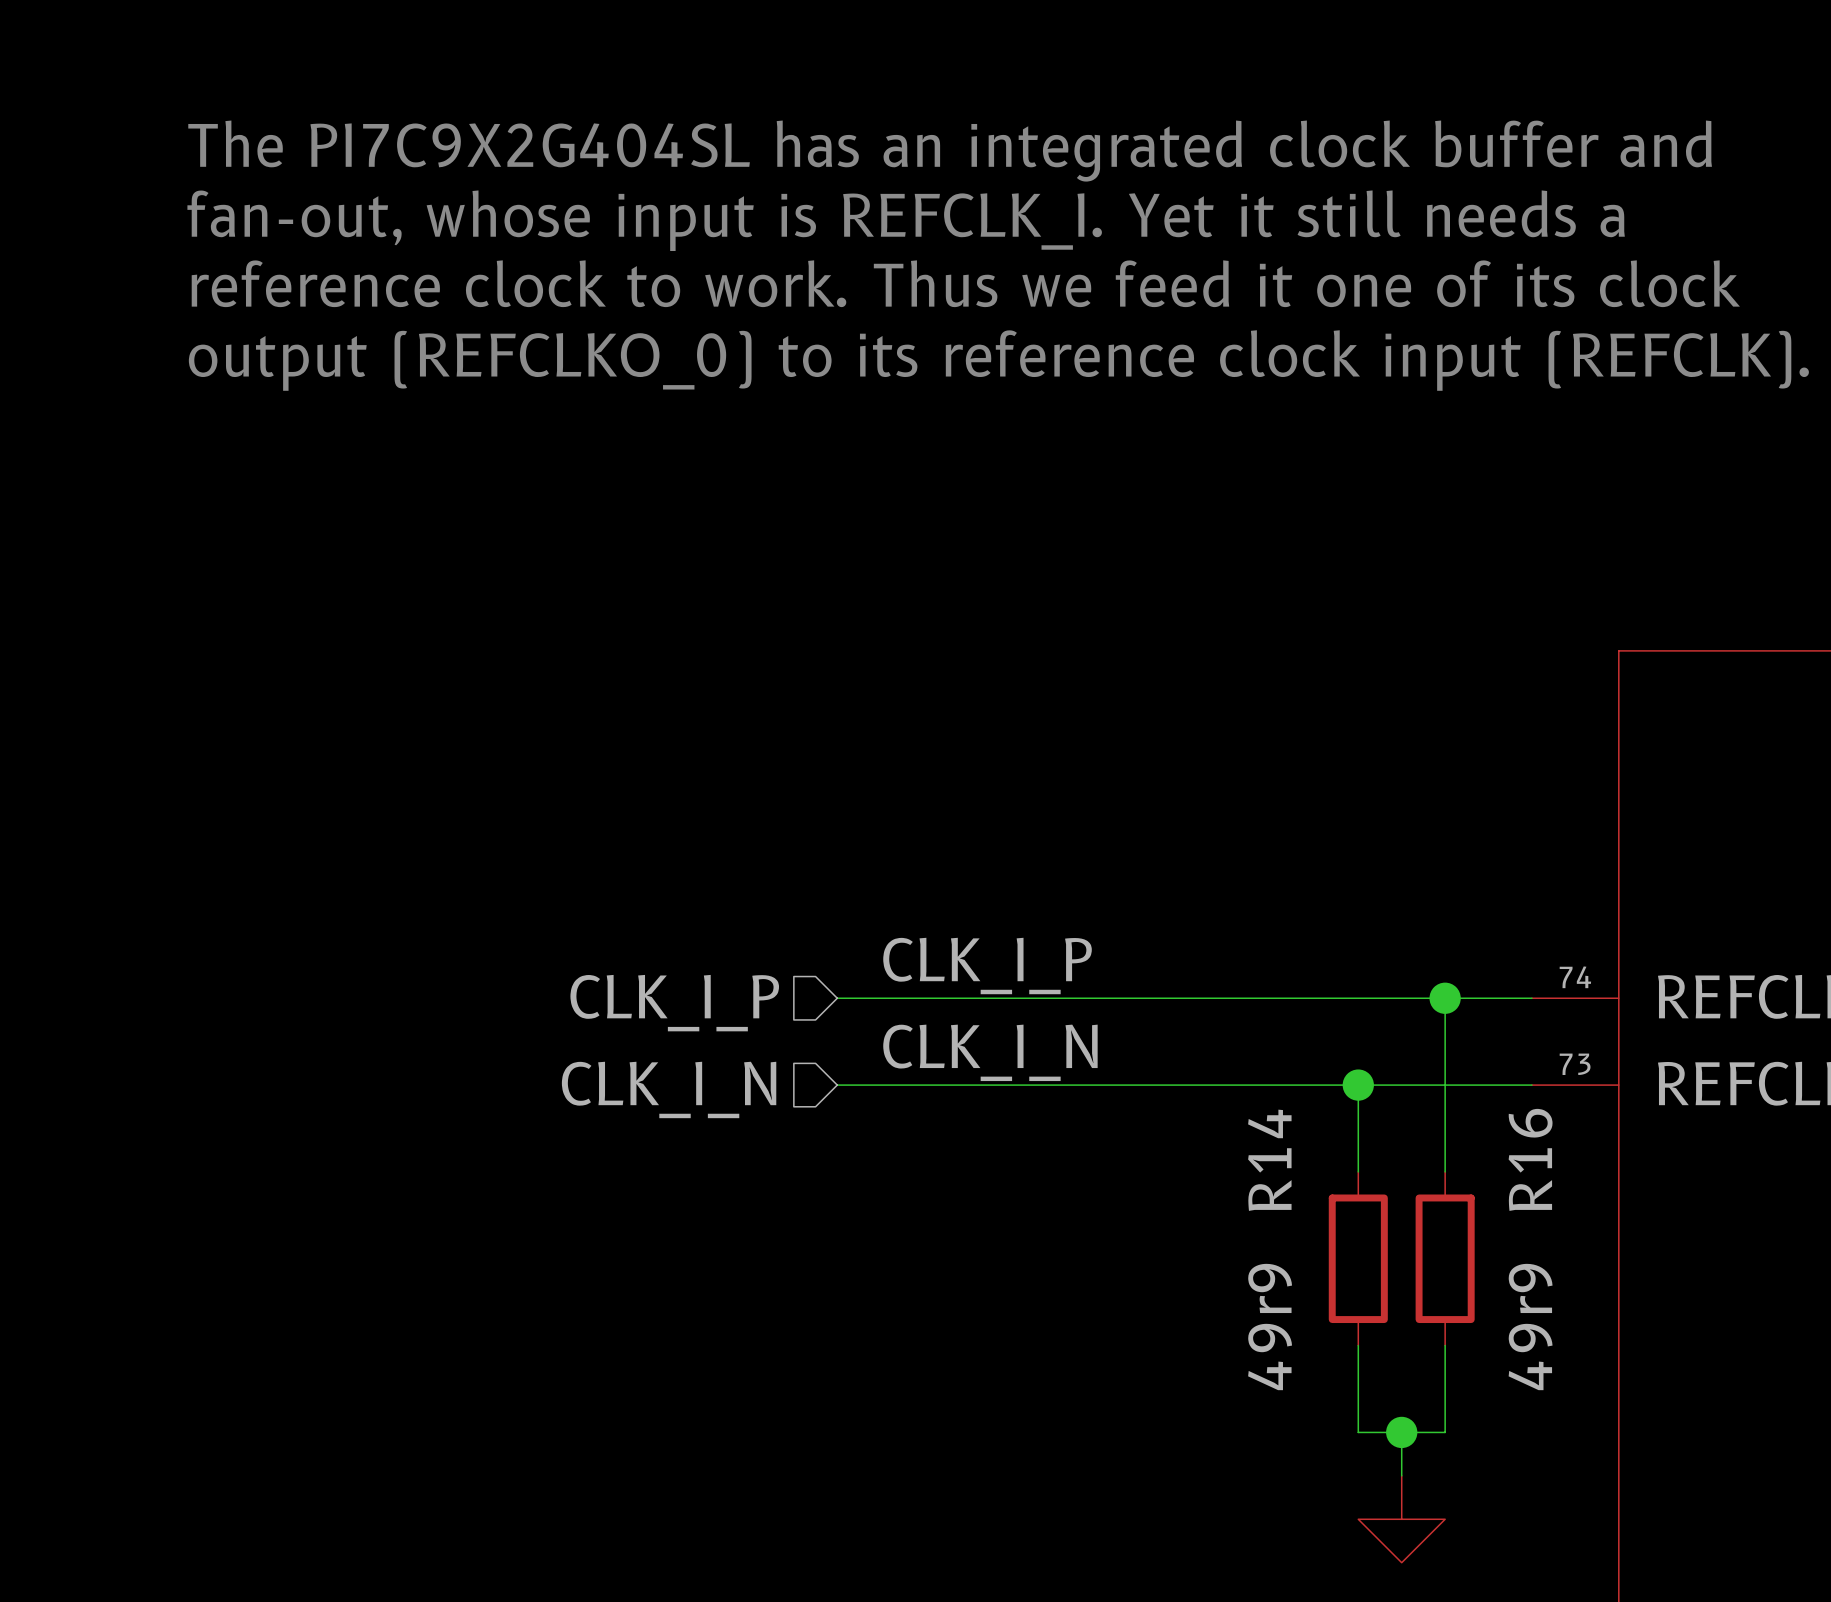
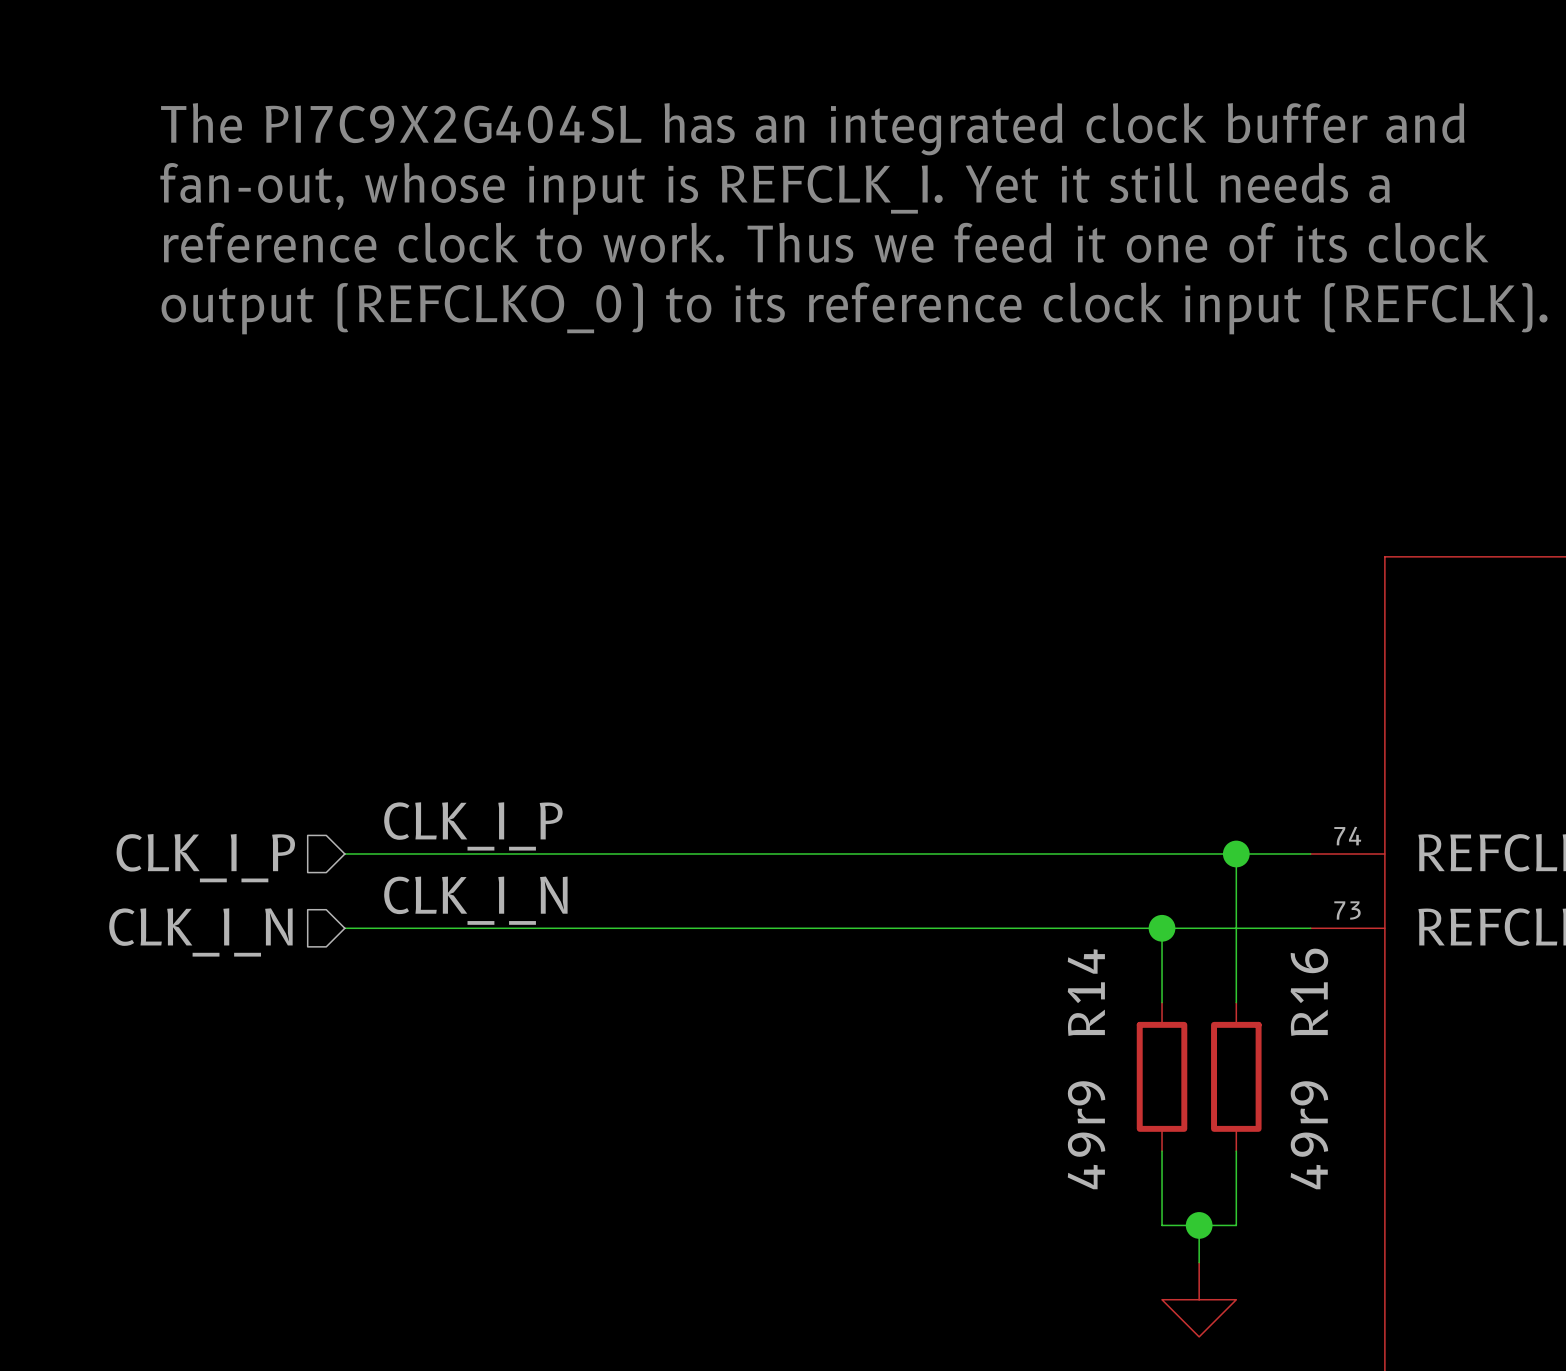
label position: CLK_I_P (987, 966) -> CLK_I_P (473, 826)
wire: none -> (344, 854) (716, 854)
hierarchical label position: CLK_I_P (674, 1003) -> CLK_I_P (205, 858)
label position: CLK_I_N (990, 1052) -> CLK_I_N (475, 900)
wire: none -> (344, 928) (716, 928)
hierarchical label position: CLK_I_N (669, 1089) -> CLK_I_N (200, 932)

